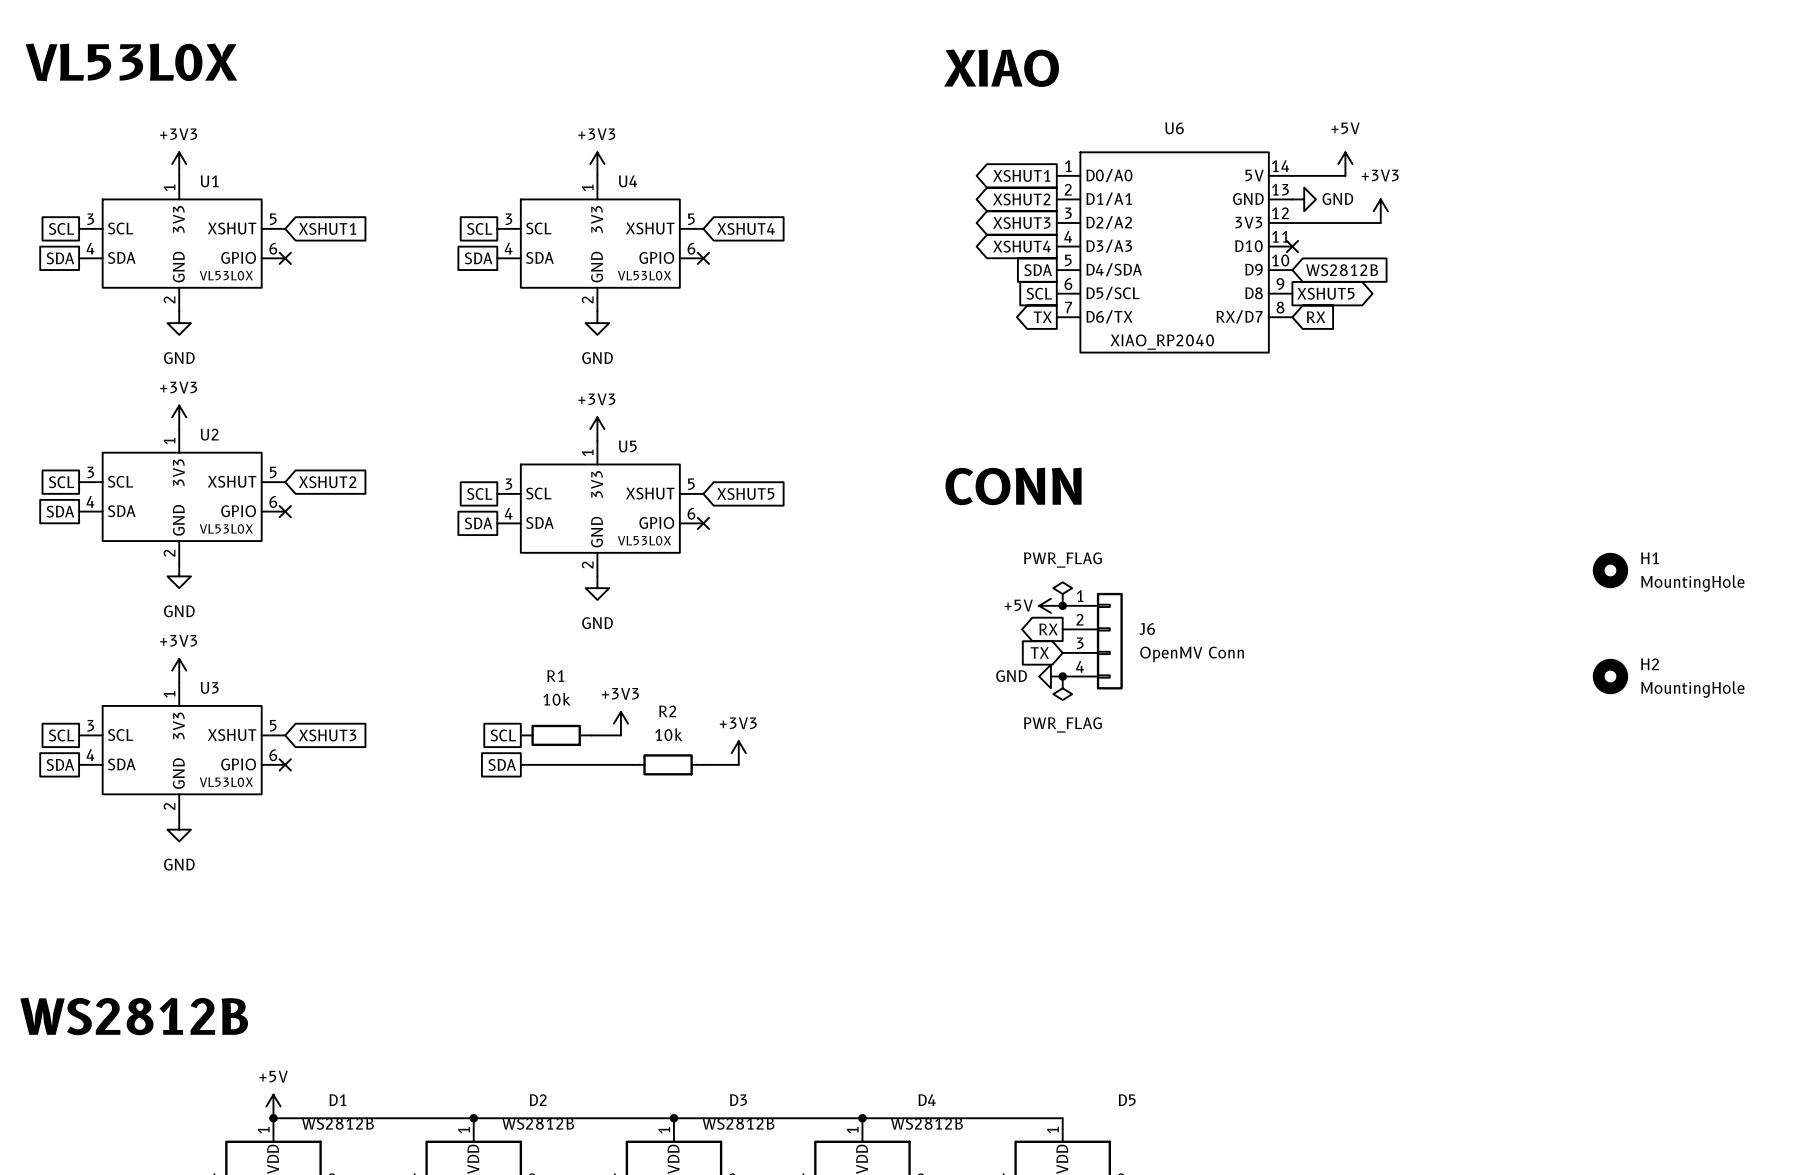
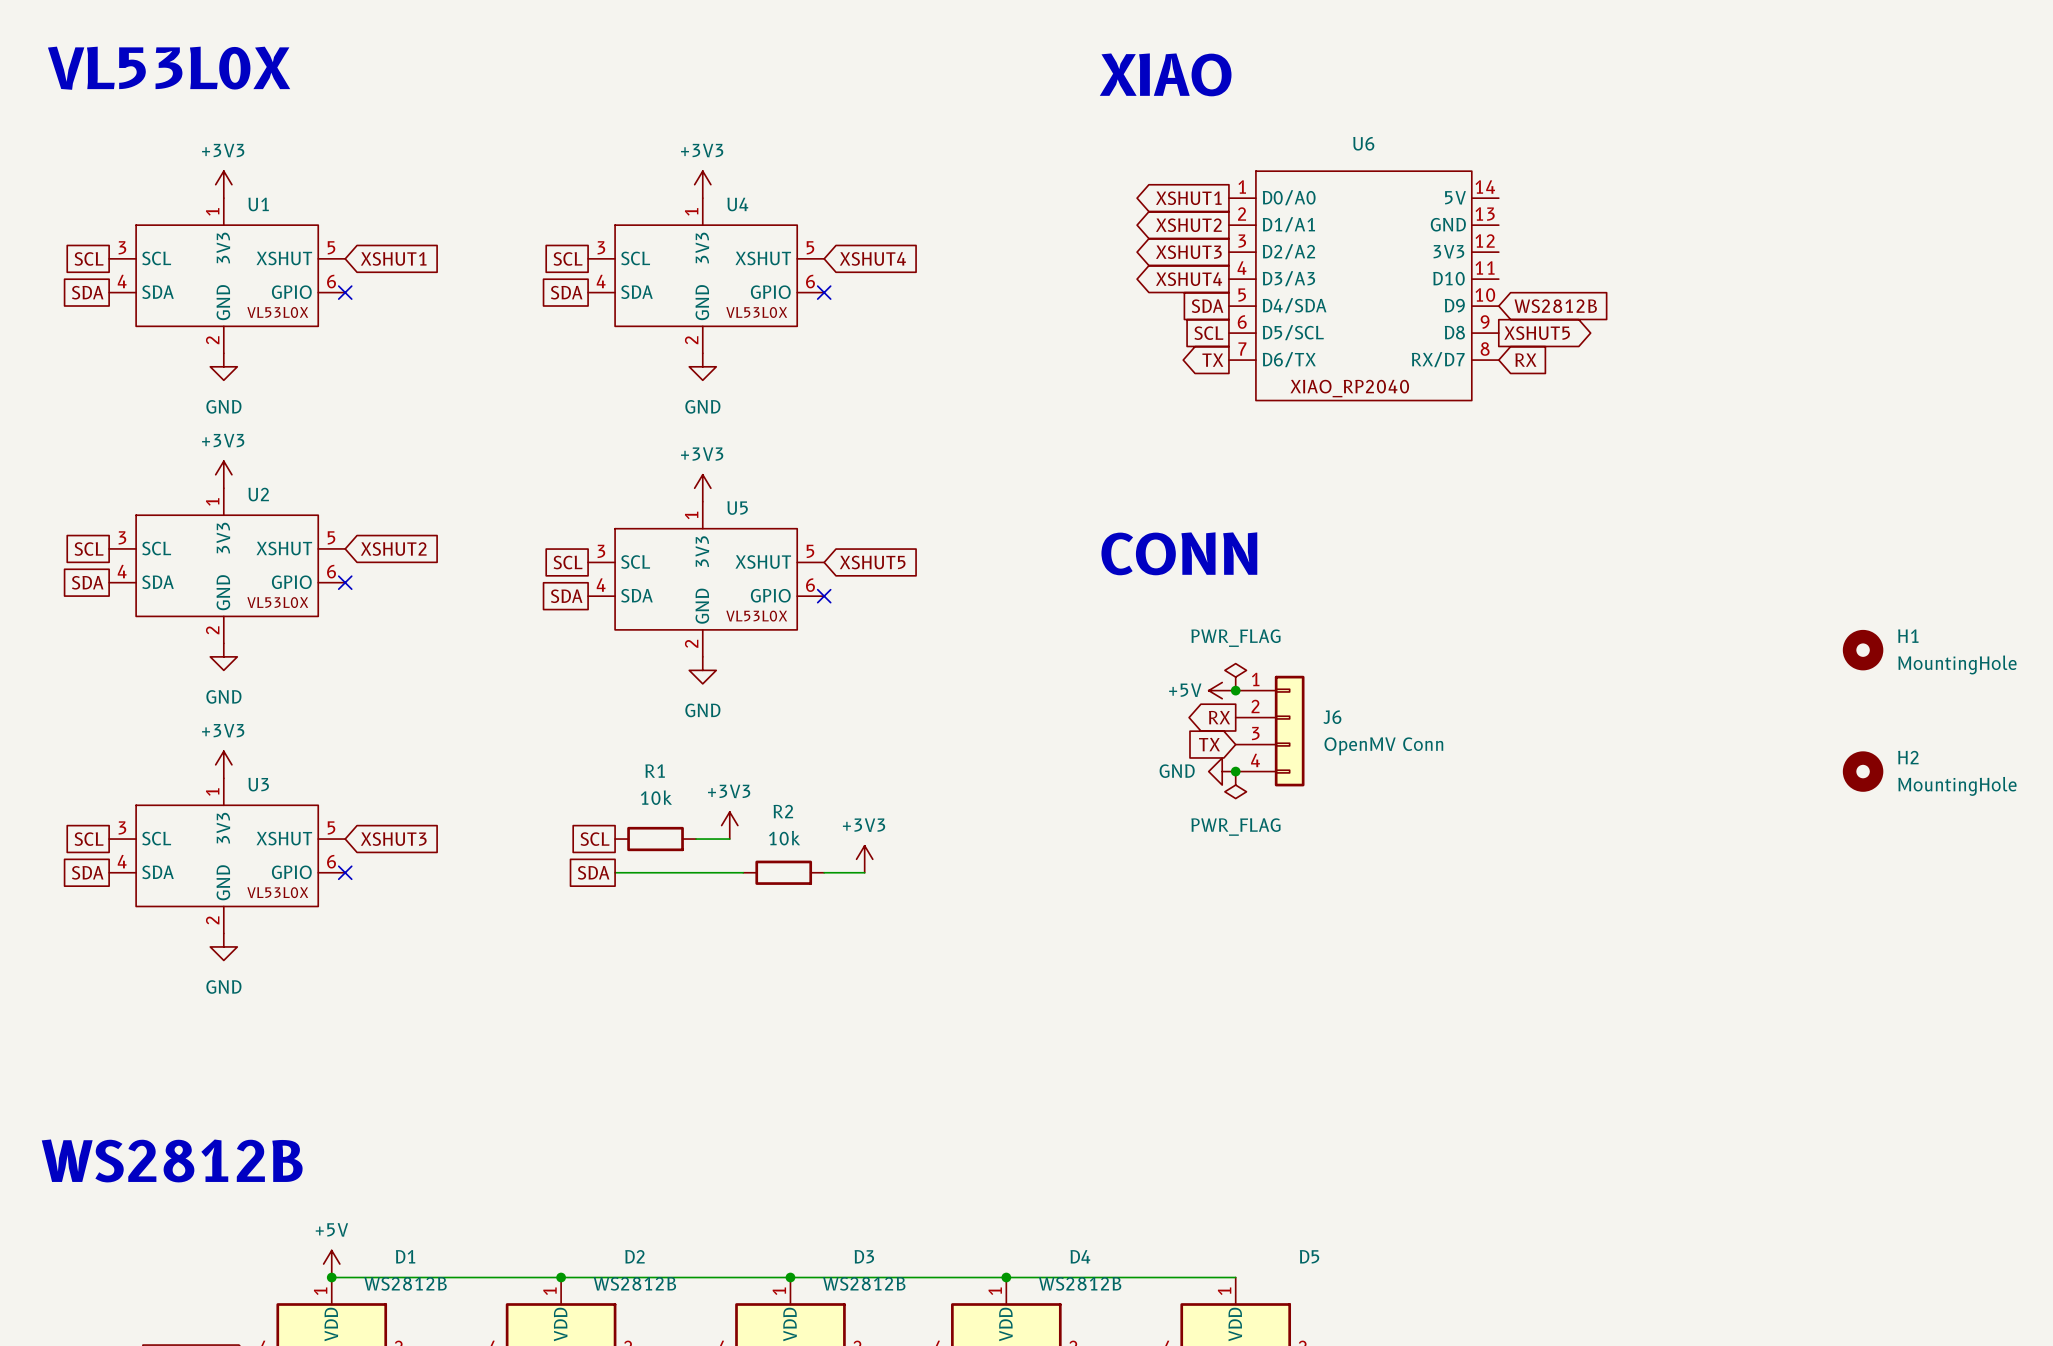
power symbol: +5V (1345, 164) -> none
wire: (1292, 175) (1345, 175) -> none
power symbol: GND (1304, 199) -> none
power symbol: +3V3 (1380, 211) -> none
wire: (1292, 222) (1380, 222) -> none
no-connect mark: (1292, 246) -> none

